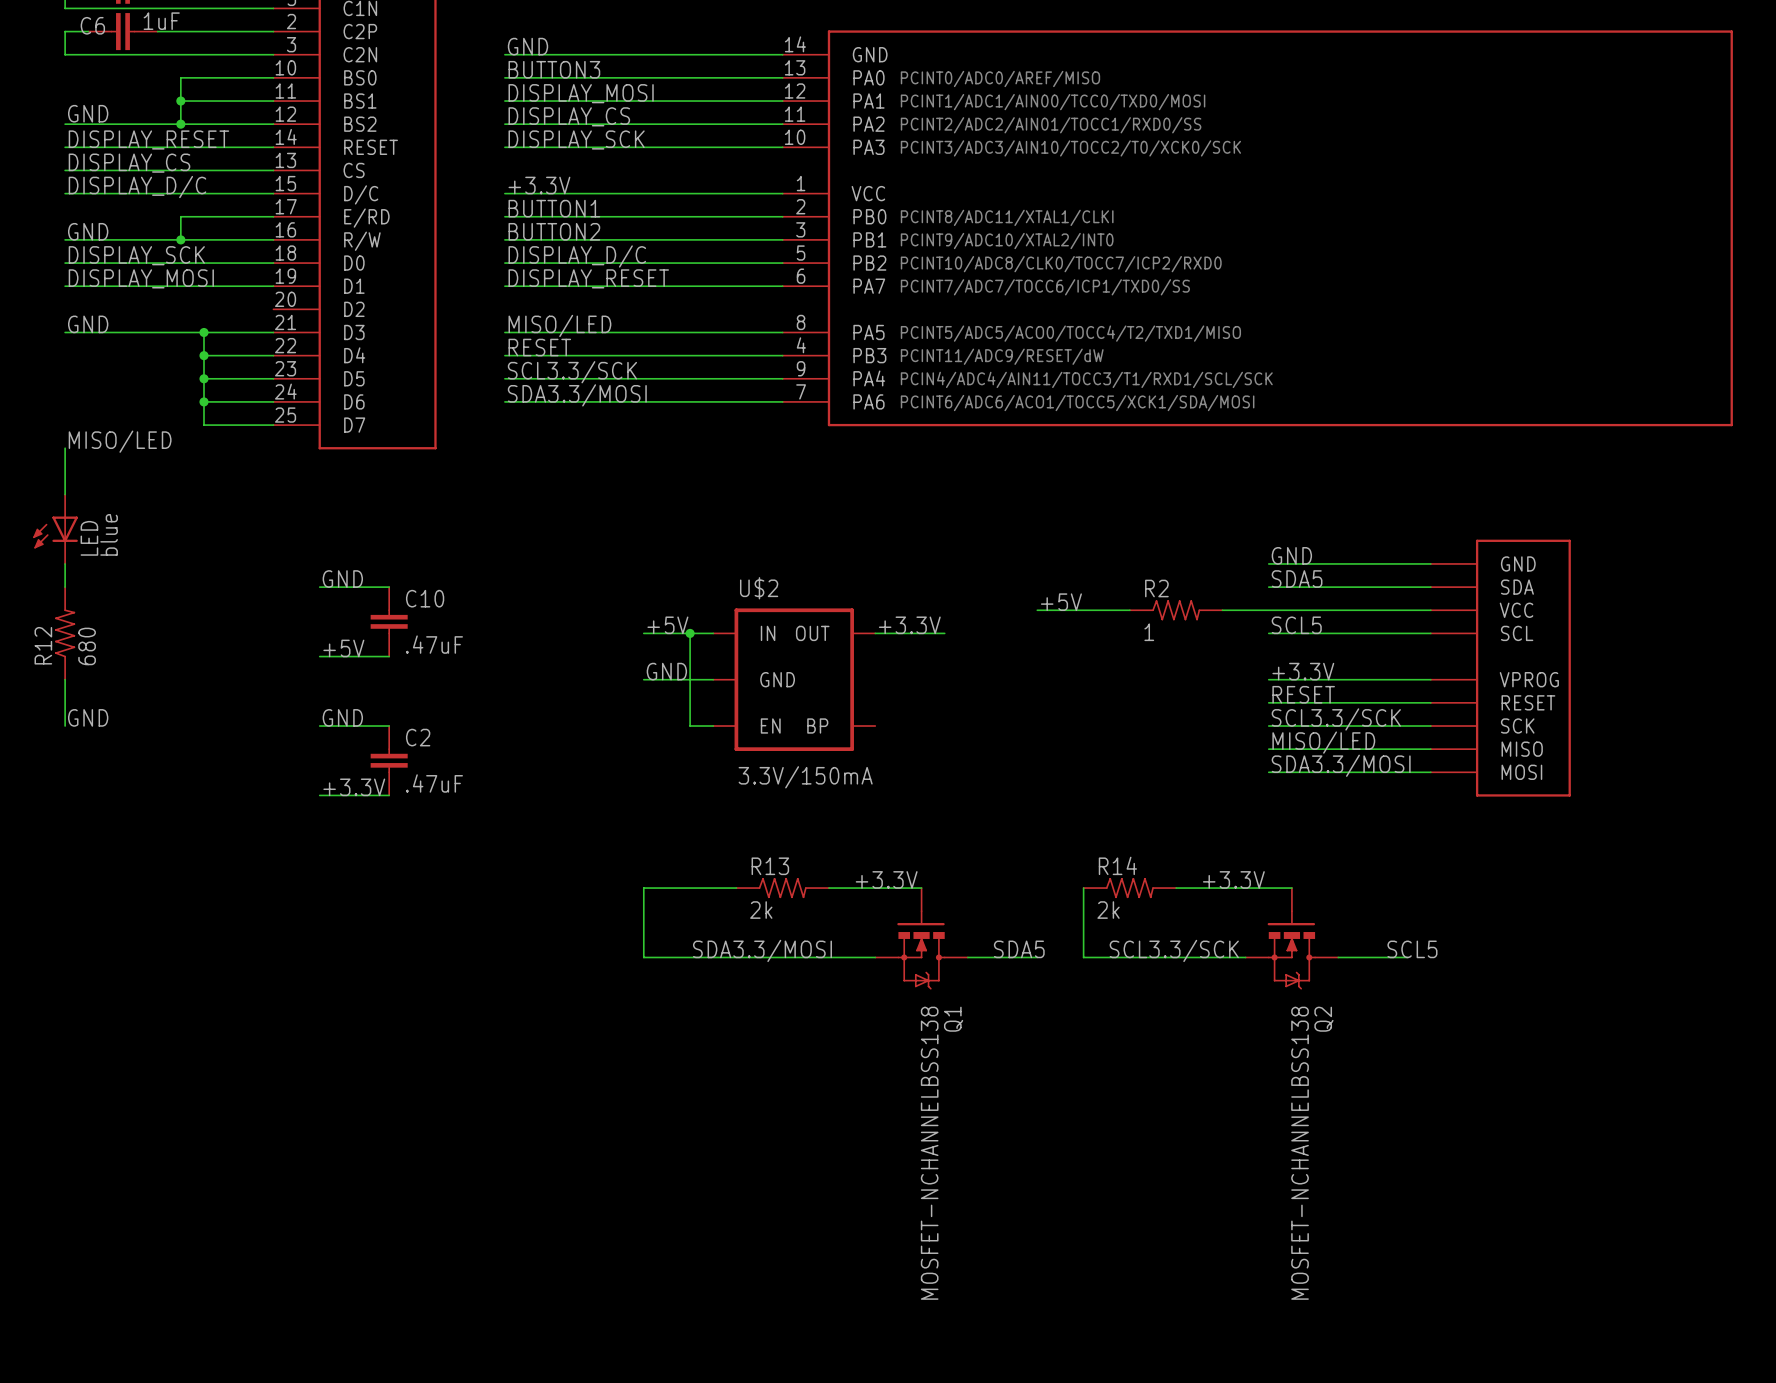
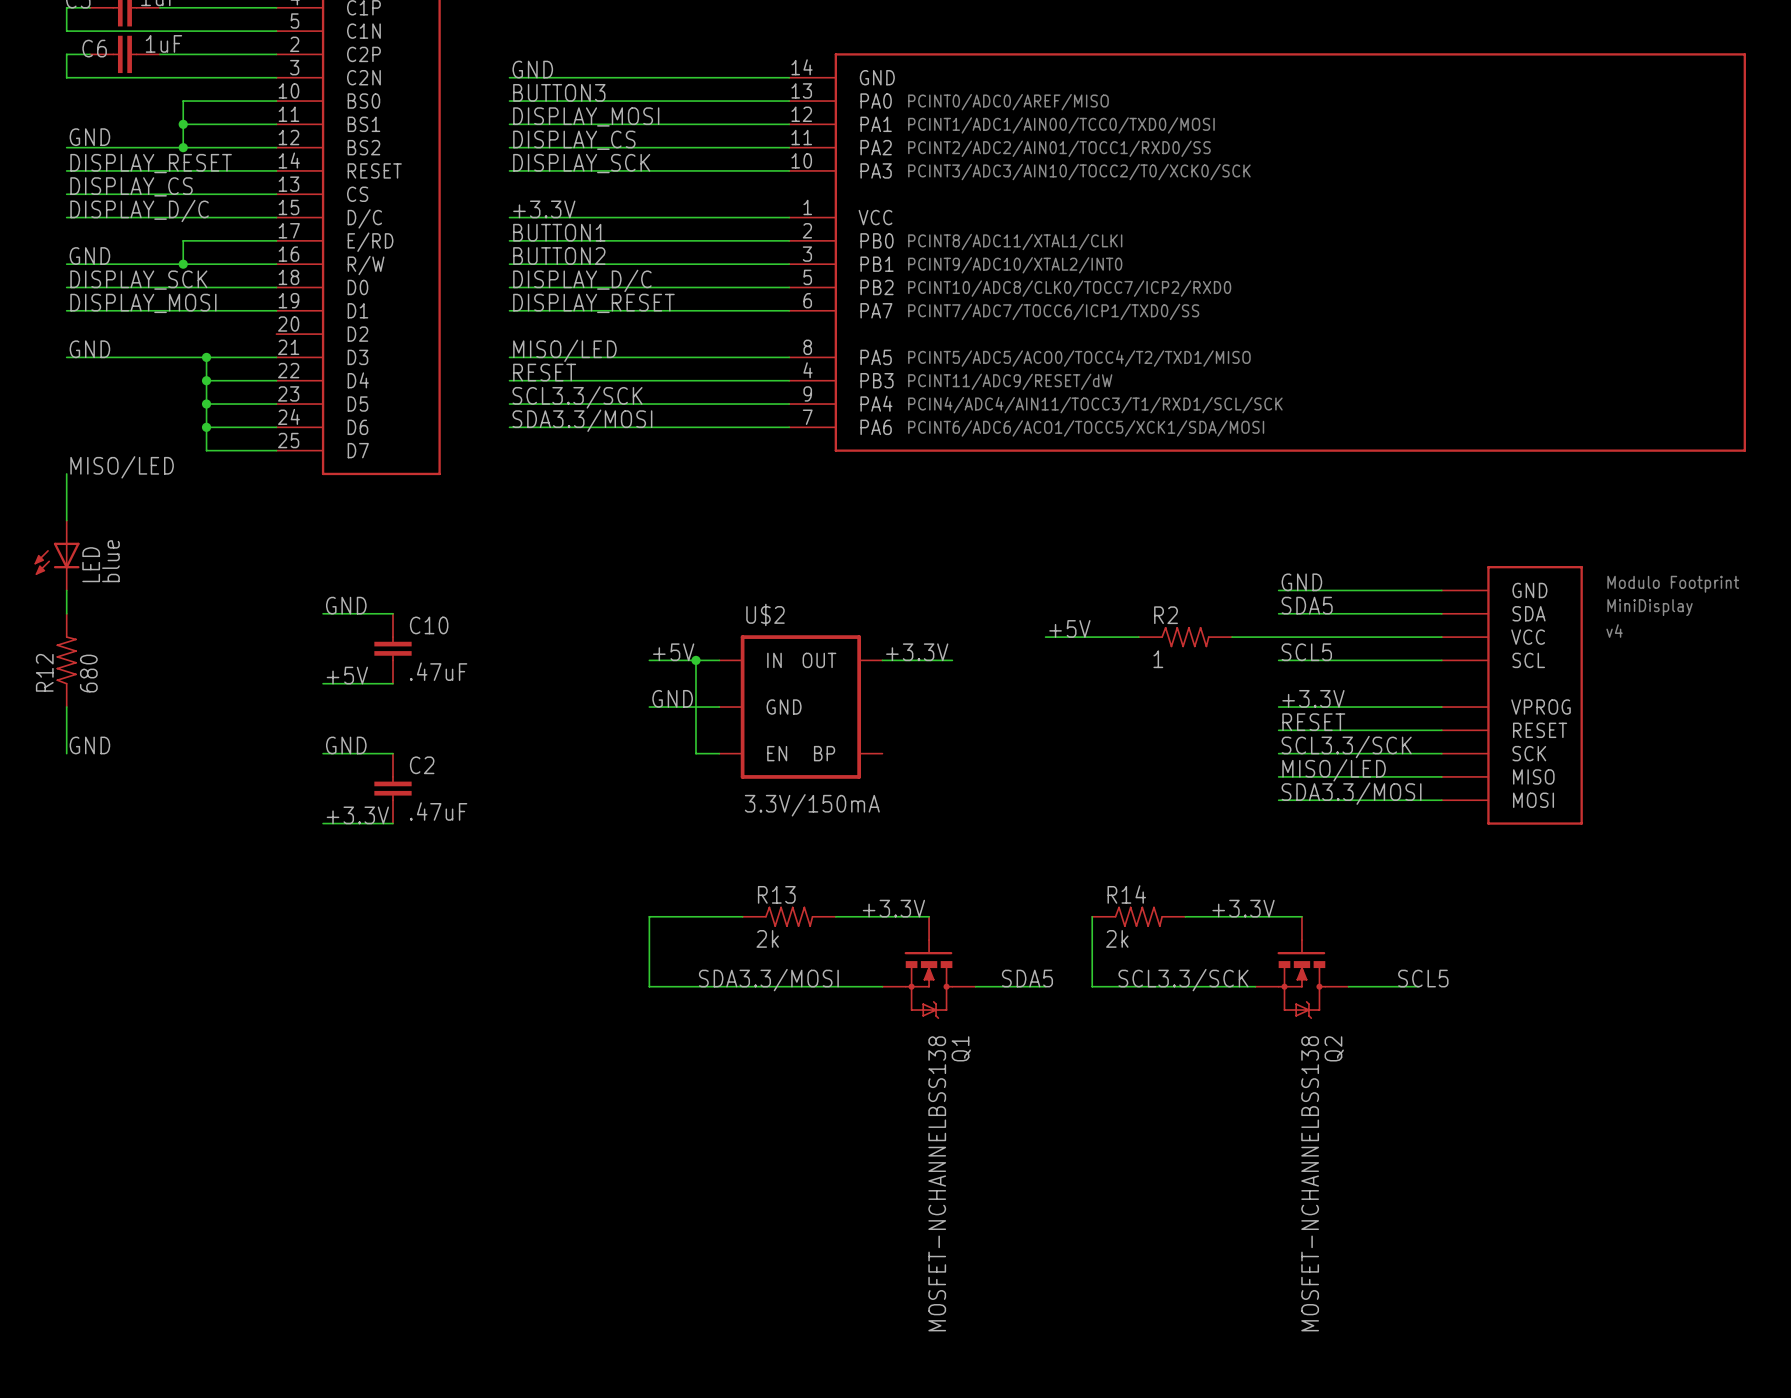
part text: none -> Modulo Footprint (1673, 584)
part text: none -> MiniDisplay (1650, 607)
part text: none -> v4 (1614, 630)

